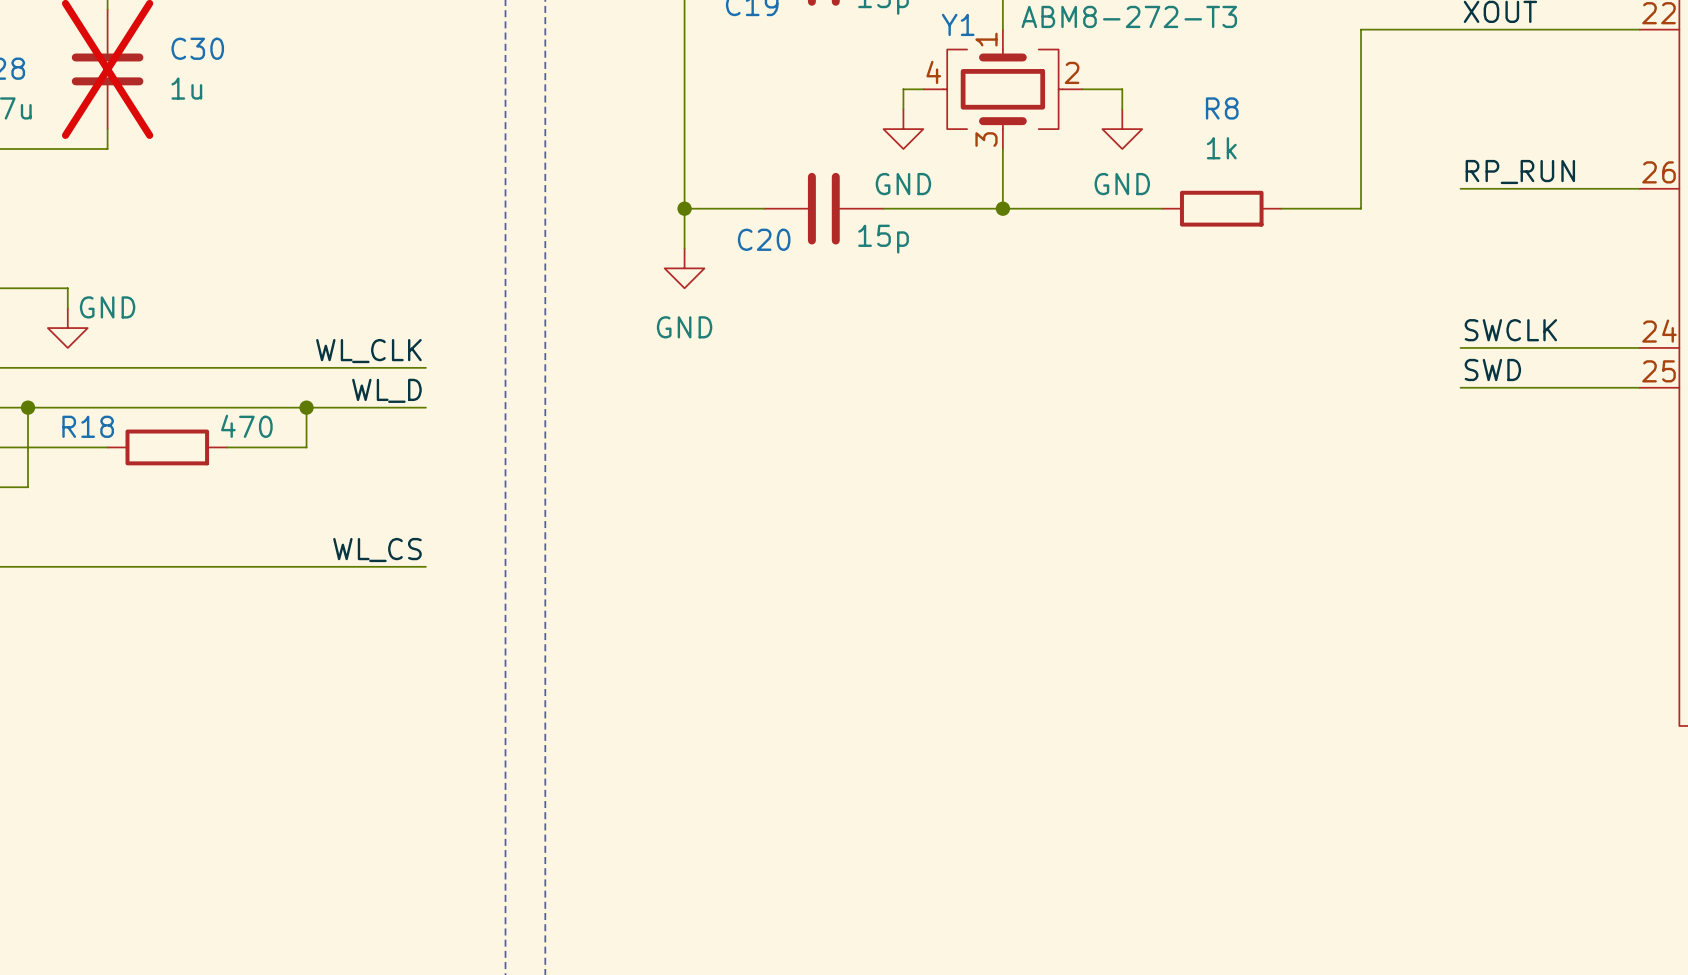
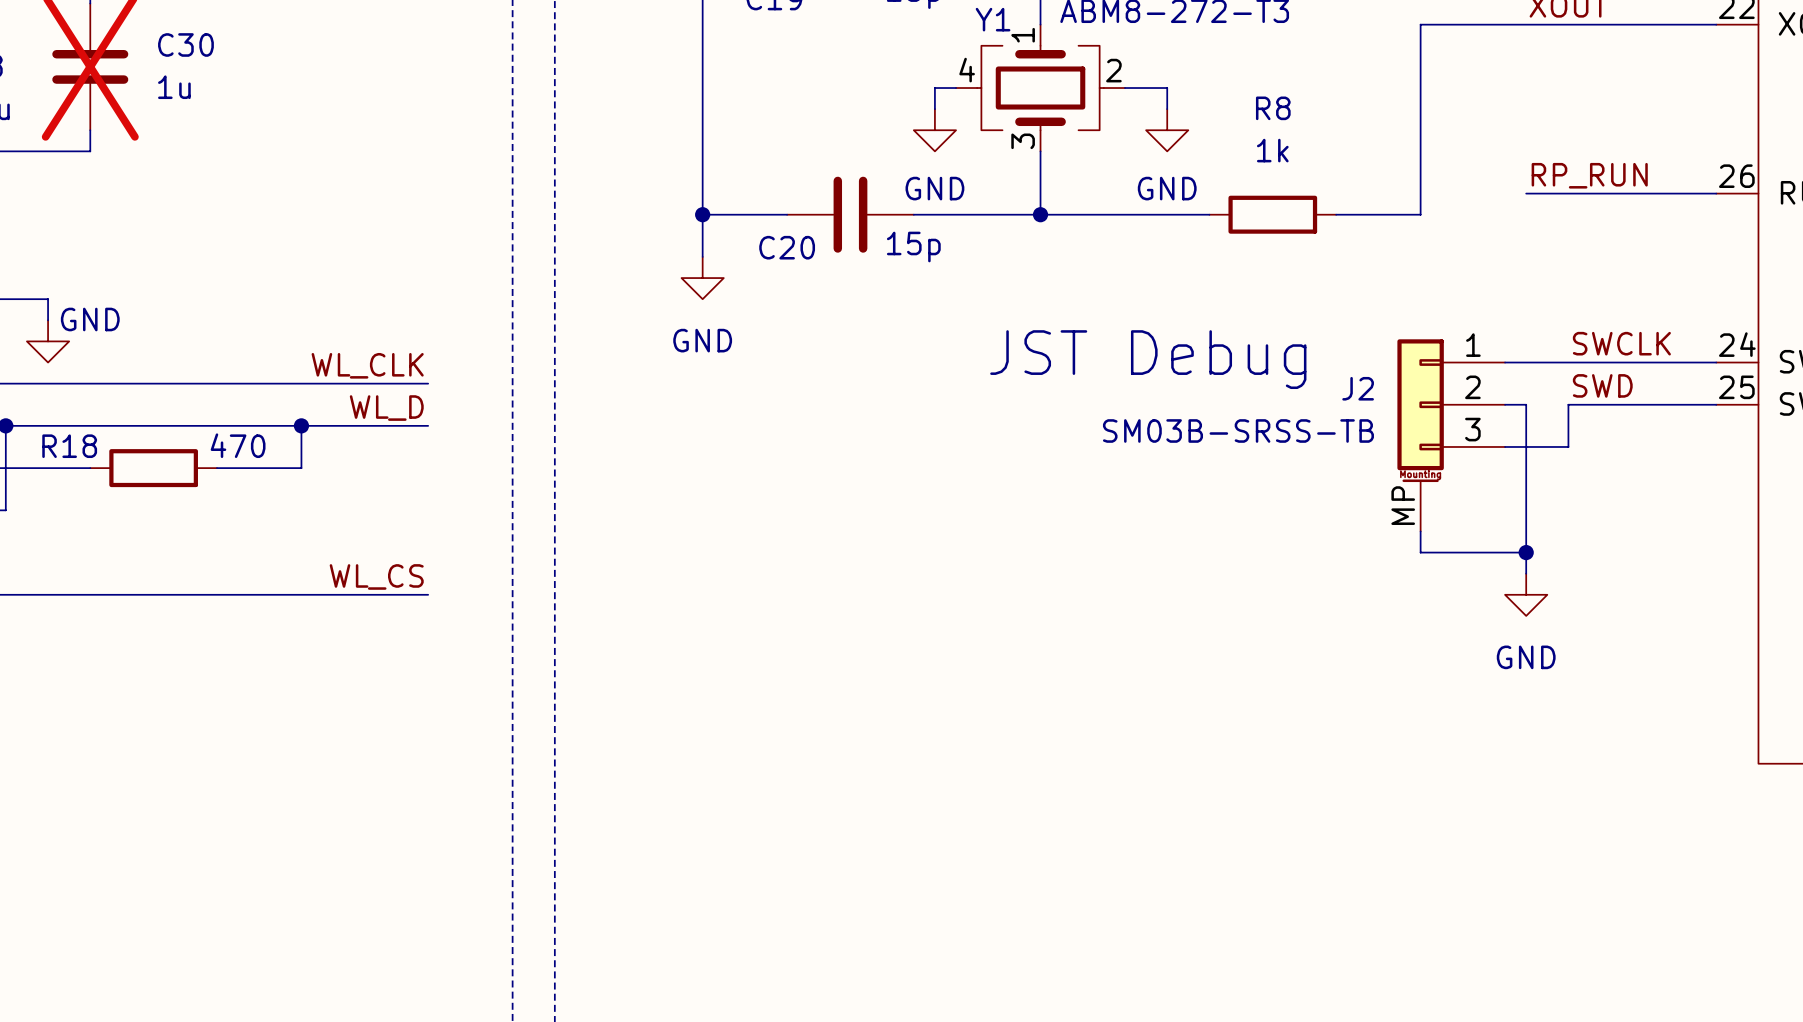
label position: SWCLK (1510, 330) -> SWCLK (1621, 343)
text: none -> JST Debug (1148, 359)
wire: none -> (1505, 362) (1526, 362)
label position: SWD (1492, 370) -> SWD (1602, 385)
wire: none -> (1505, 404) (1526, 404) (1526, 573)
wire: (1460, 387) (1500, 387) -> (1505, 446) (1568, 446) (1568, 404)
J2: none -> SM03B-SRSS-TB (1451, 435)
wire: none -> (1420, 531) (1420, 552) (1526, 552)
junction: none -> (1526, 552)
power symbol: none -> GND (1526, 594)

